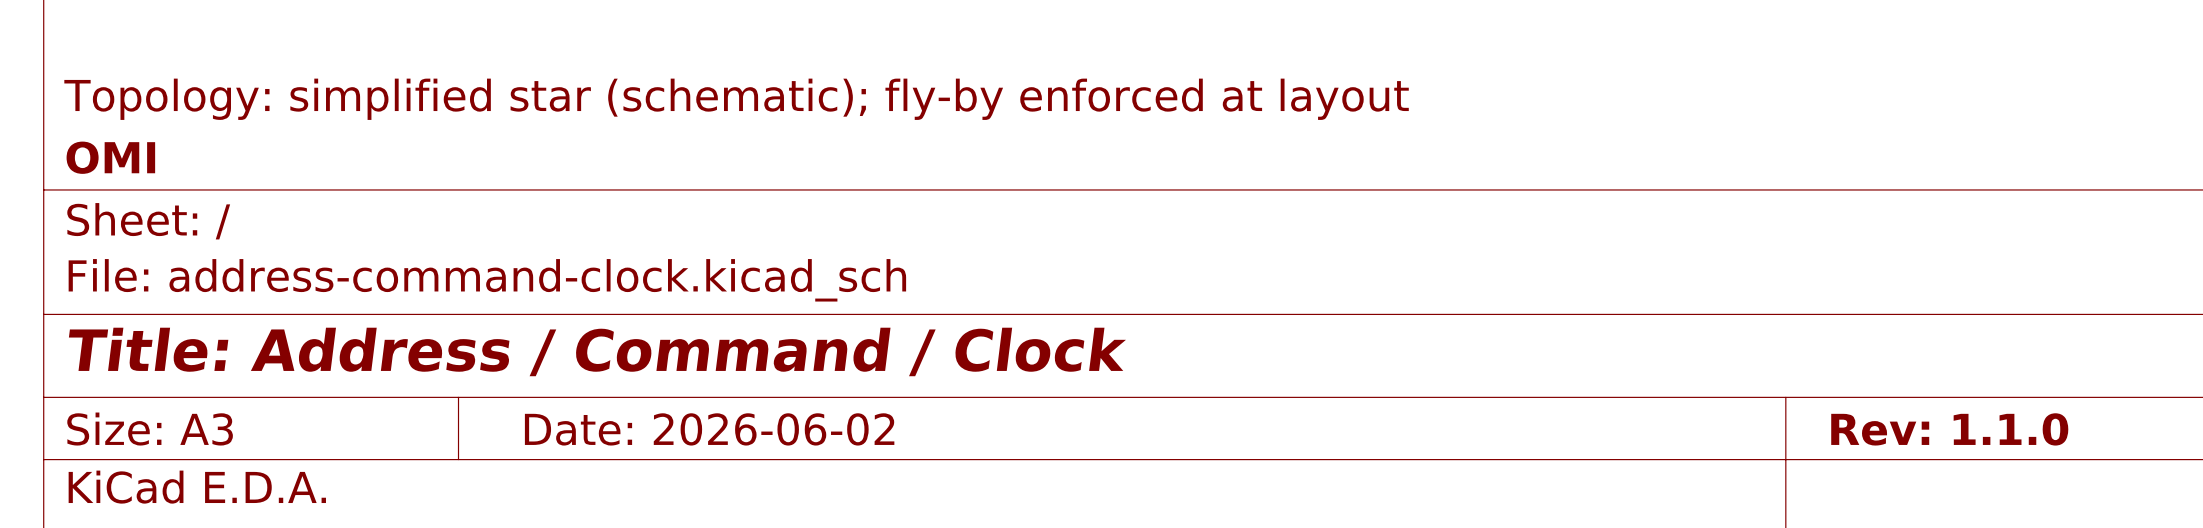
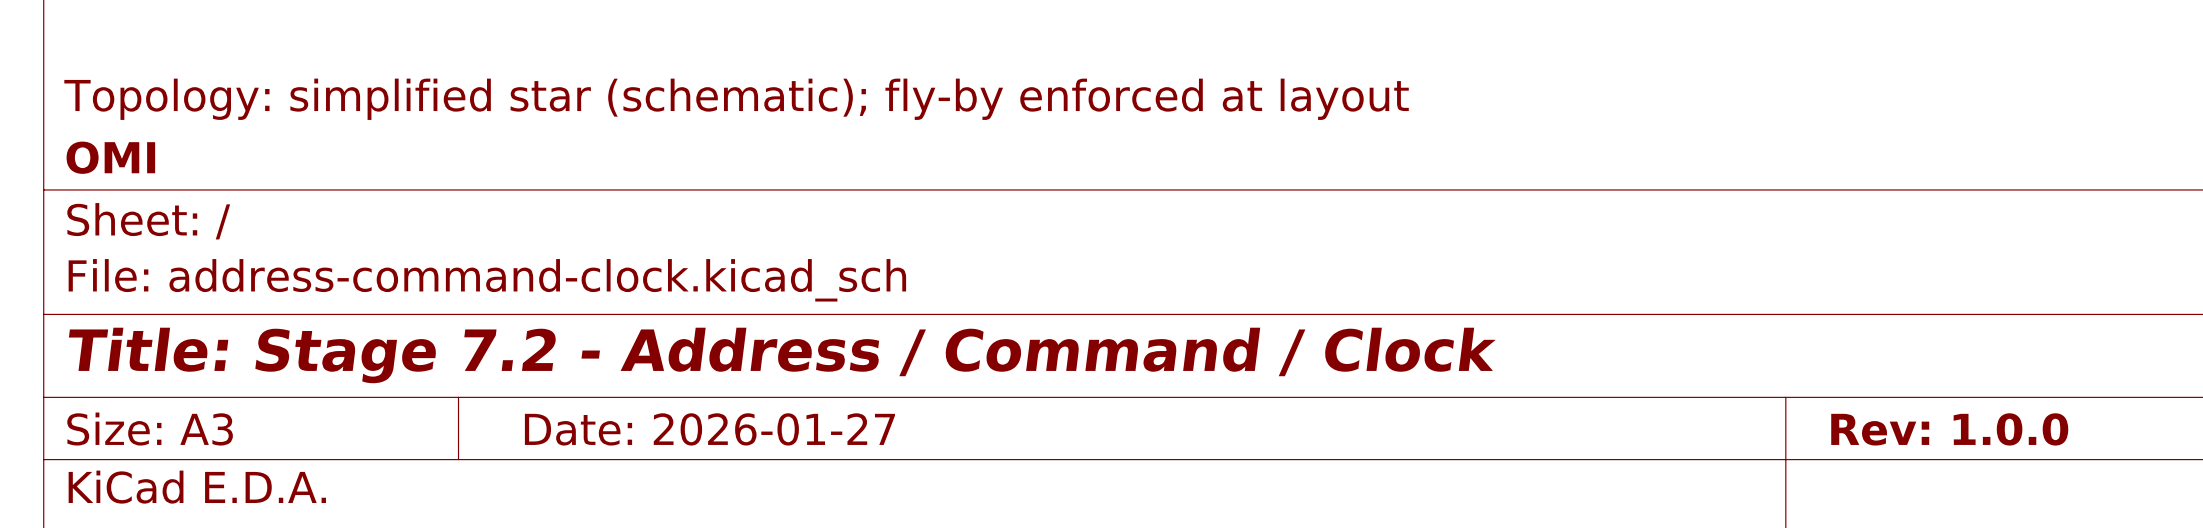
title block: Title: Address / Command / Clock (597, 351) -> Title: Stage 7.2 - Address / Command / Clock (782, 355)
title block: Date: 2026-06-02 (709, 429) -> Date: 2026-01-27 (709, 429)
title block: Rev: 1.1.0 (1949, 429) -> Rev: 1.0.0 (1949, 429)

